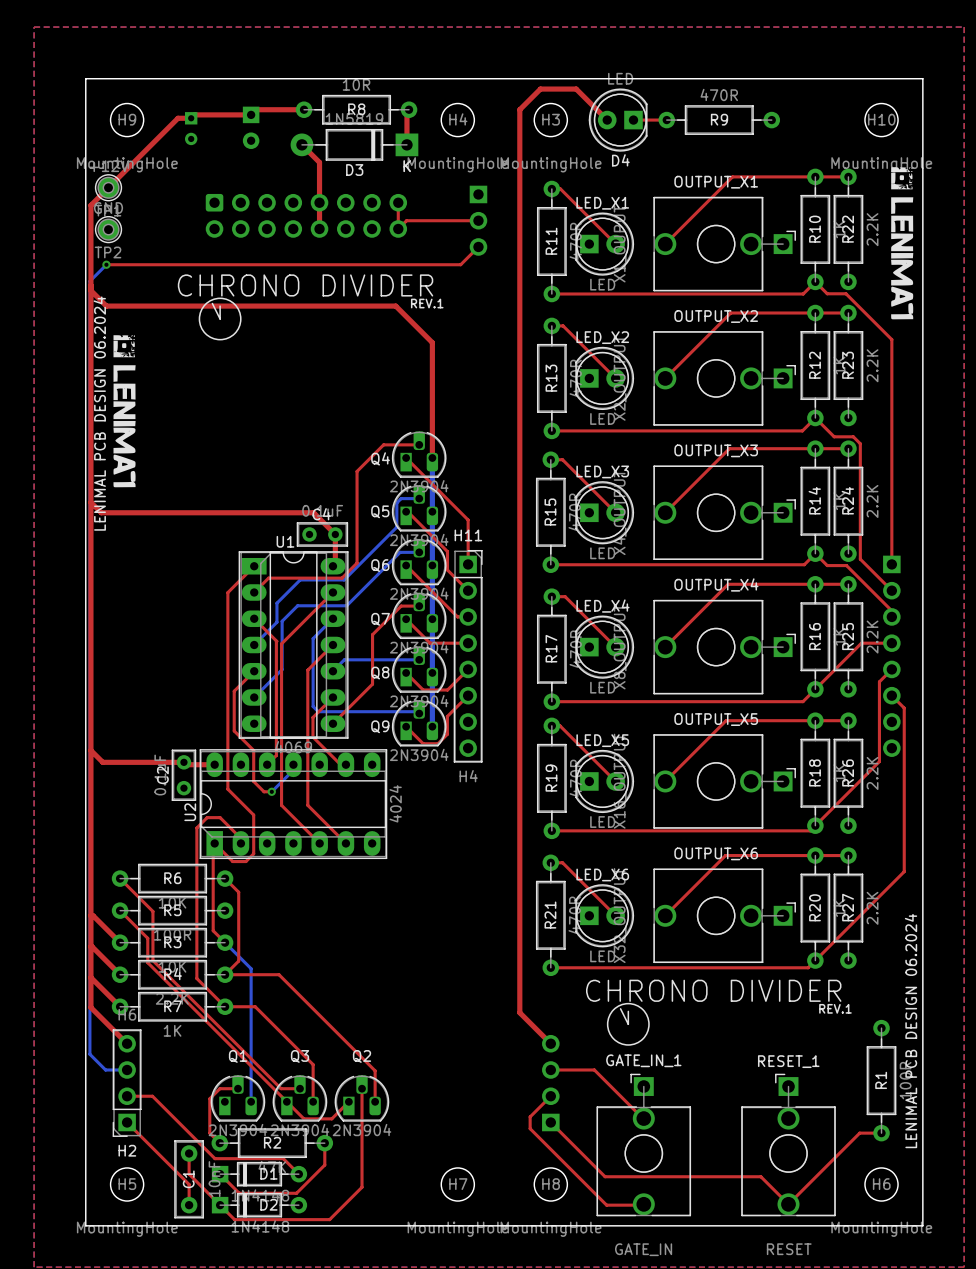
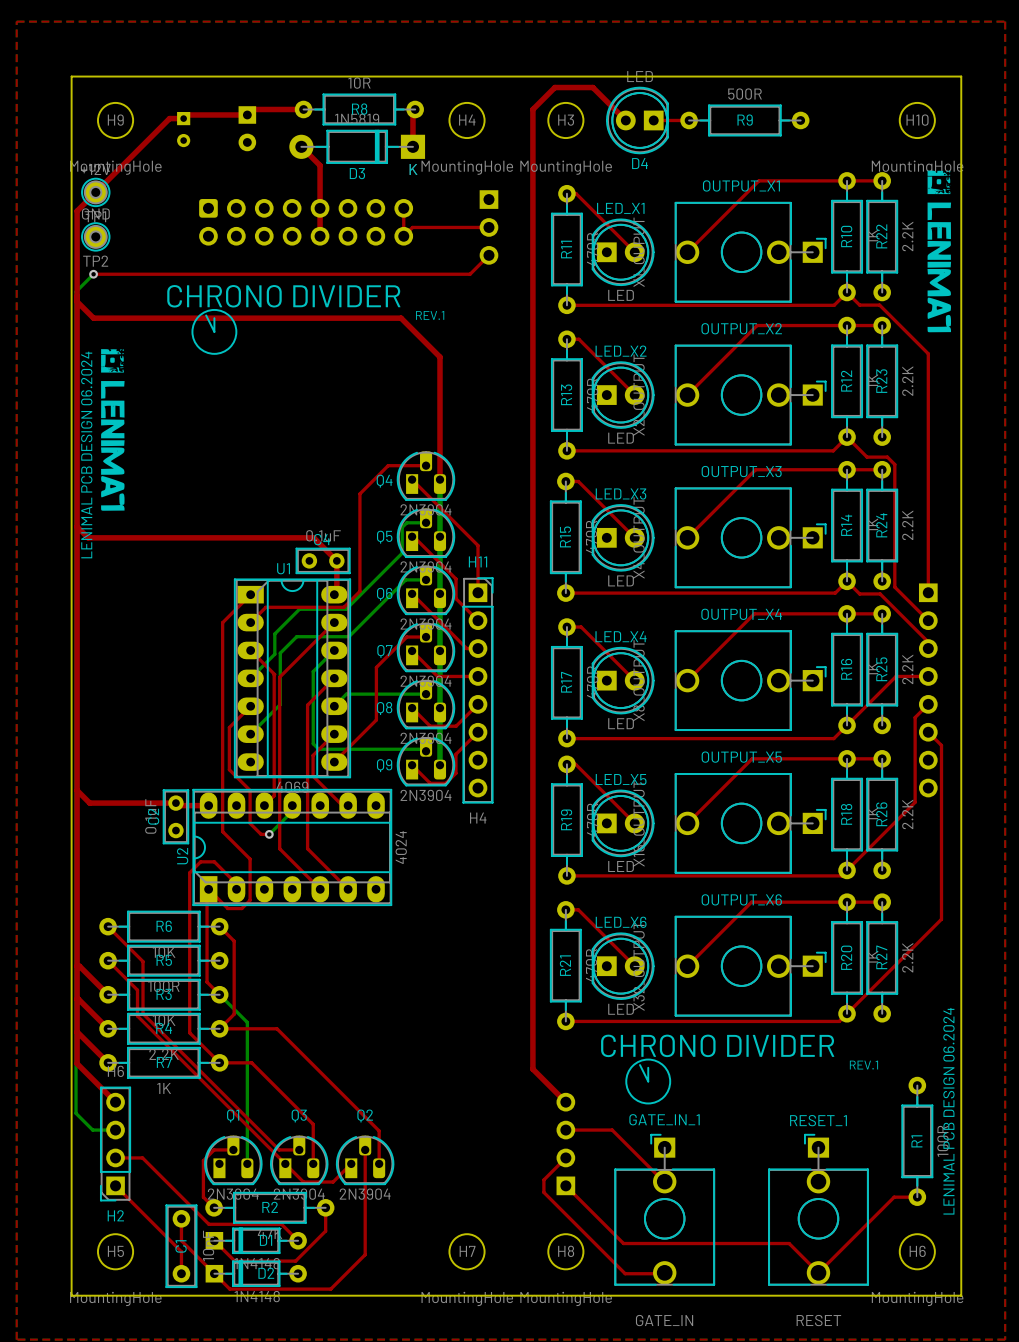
R9 value: 470R (719, 94) -> 500R (745, 94)

